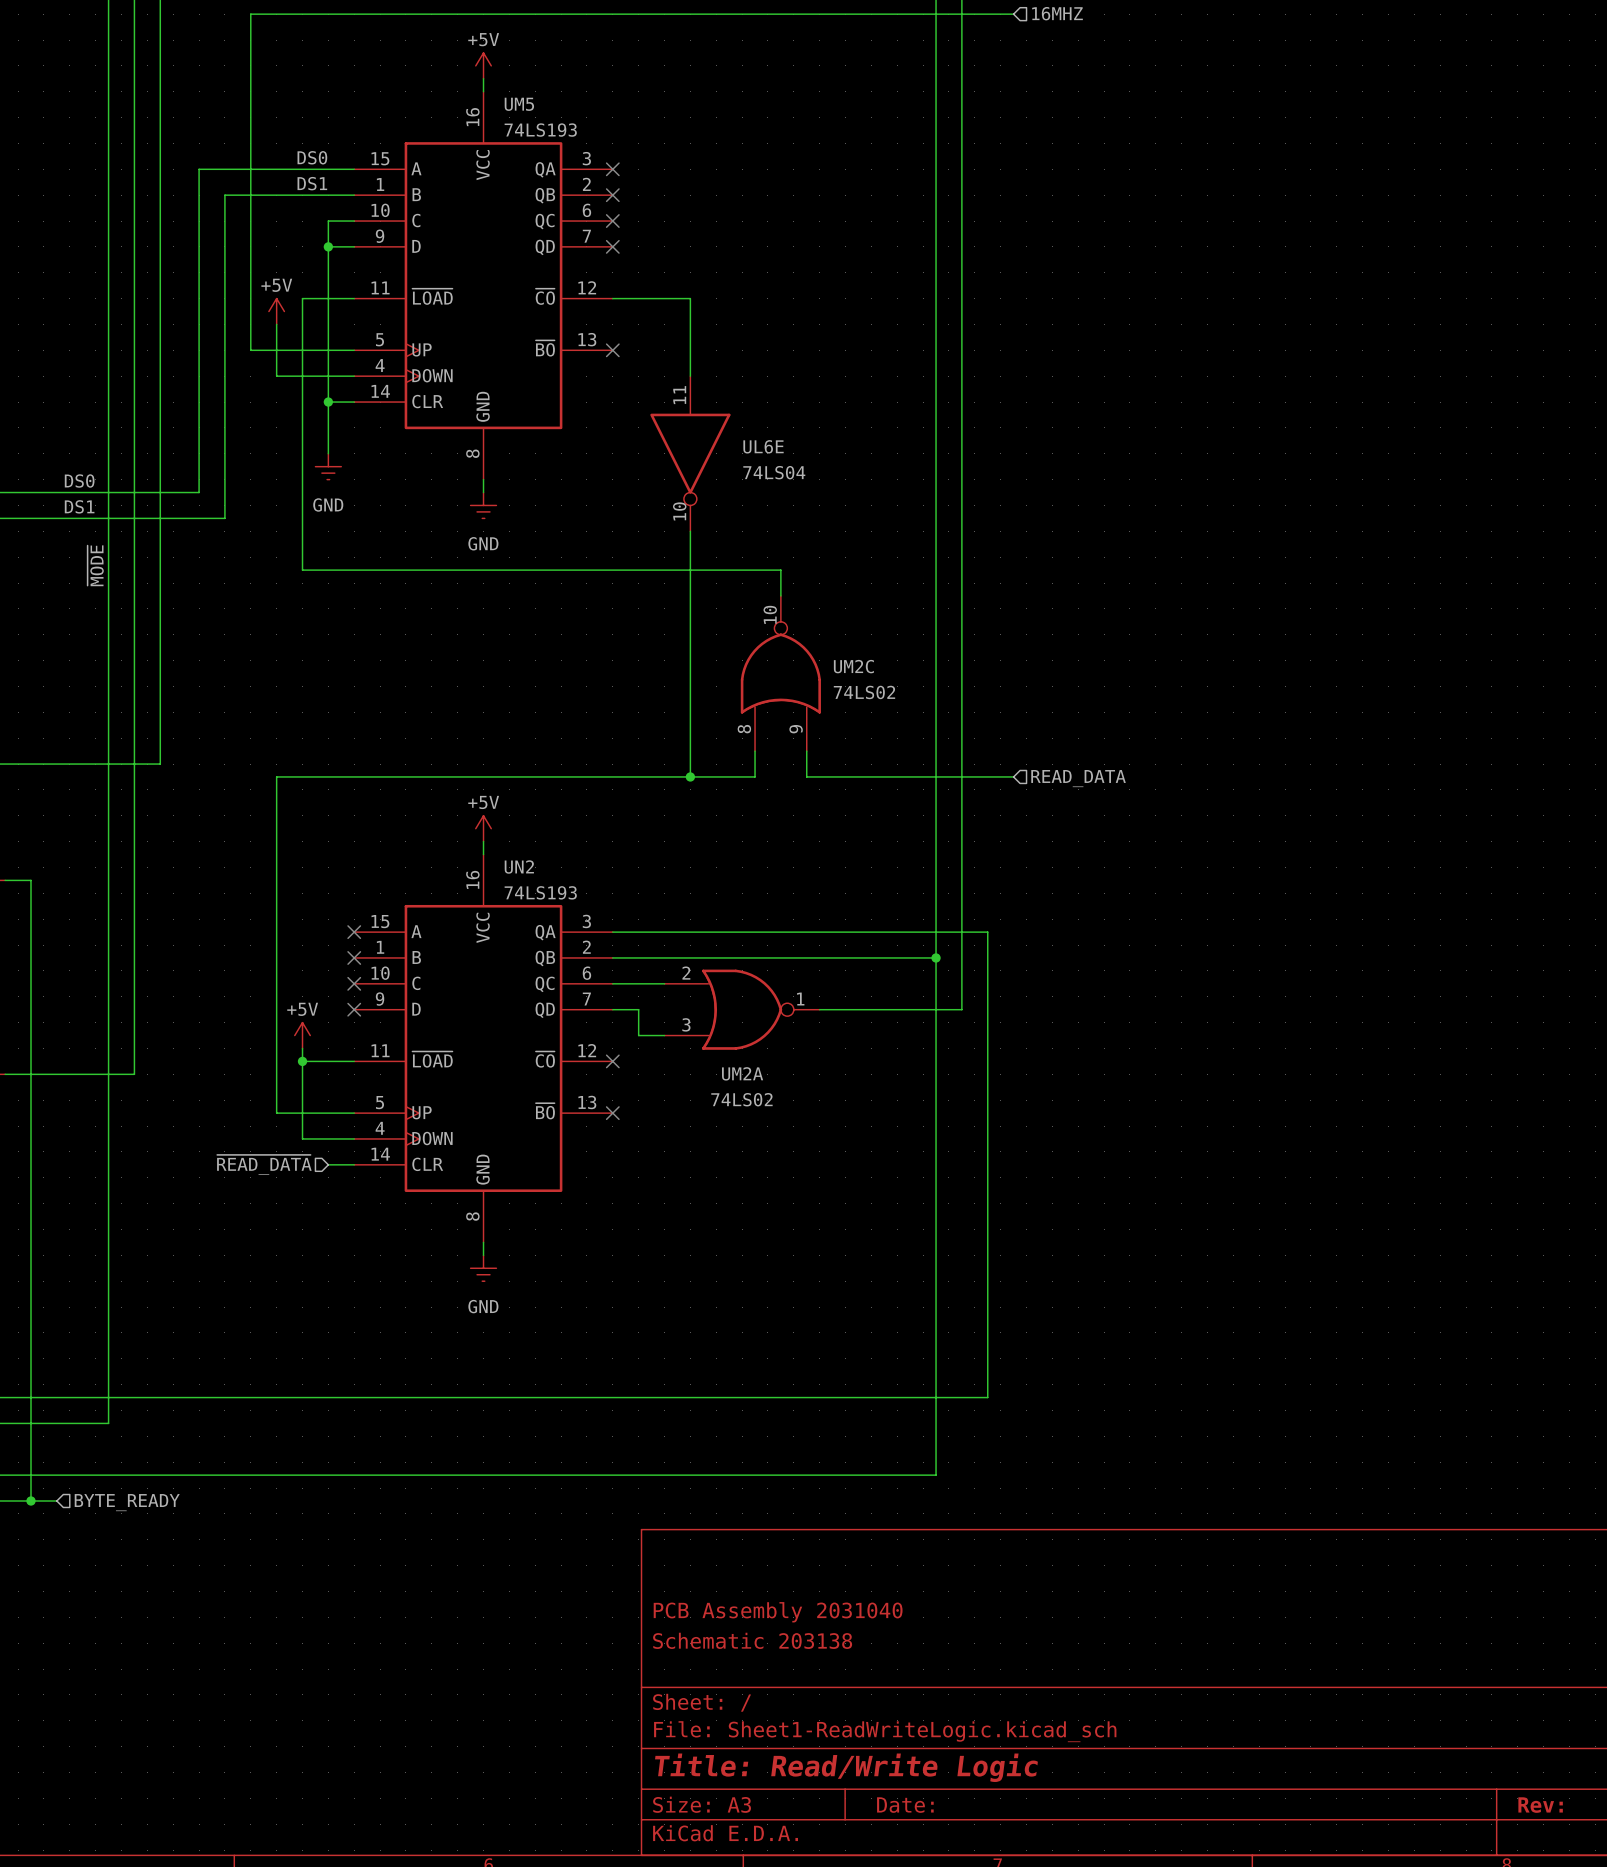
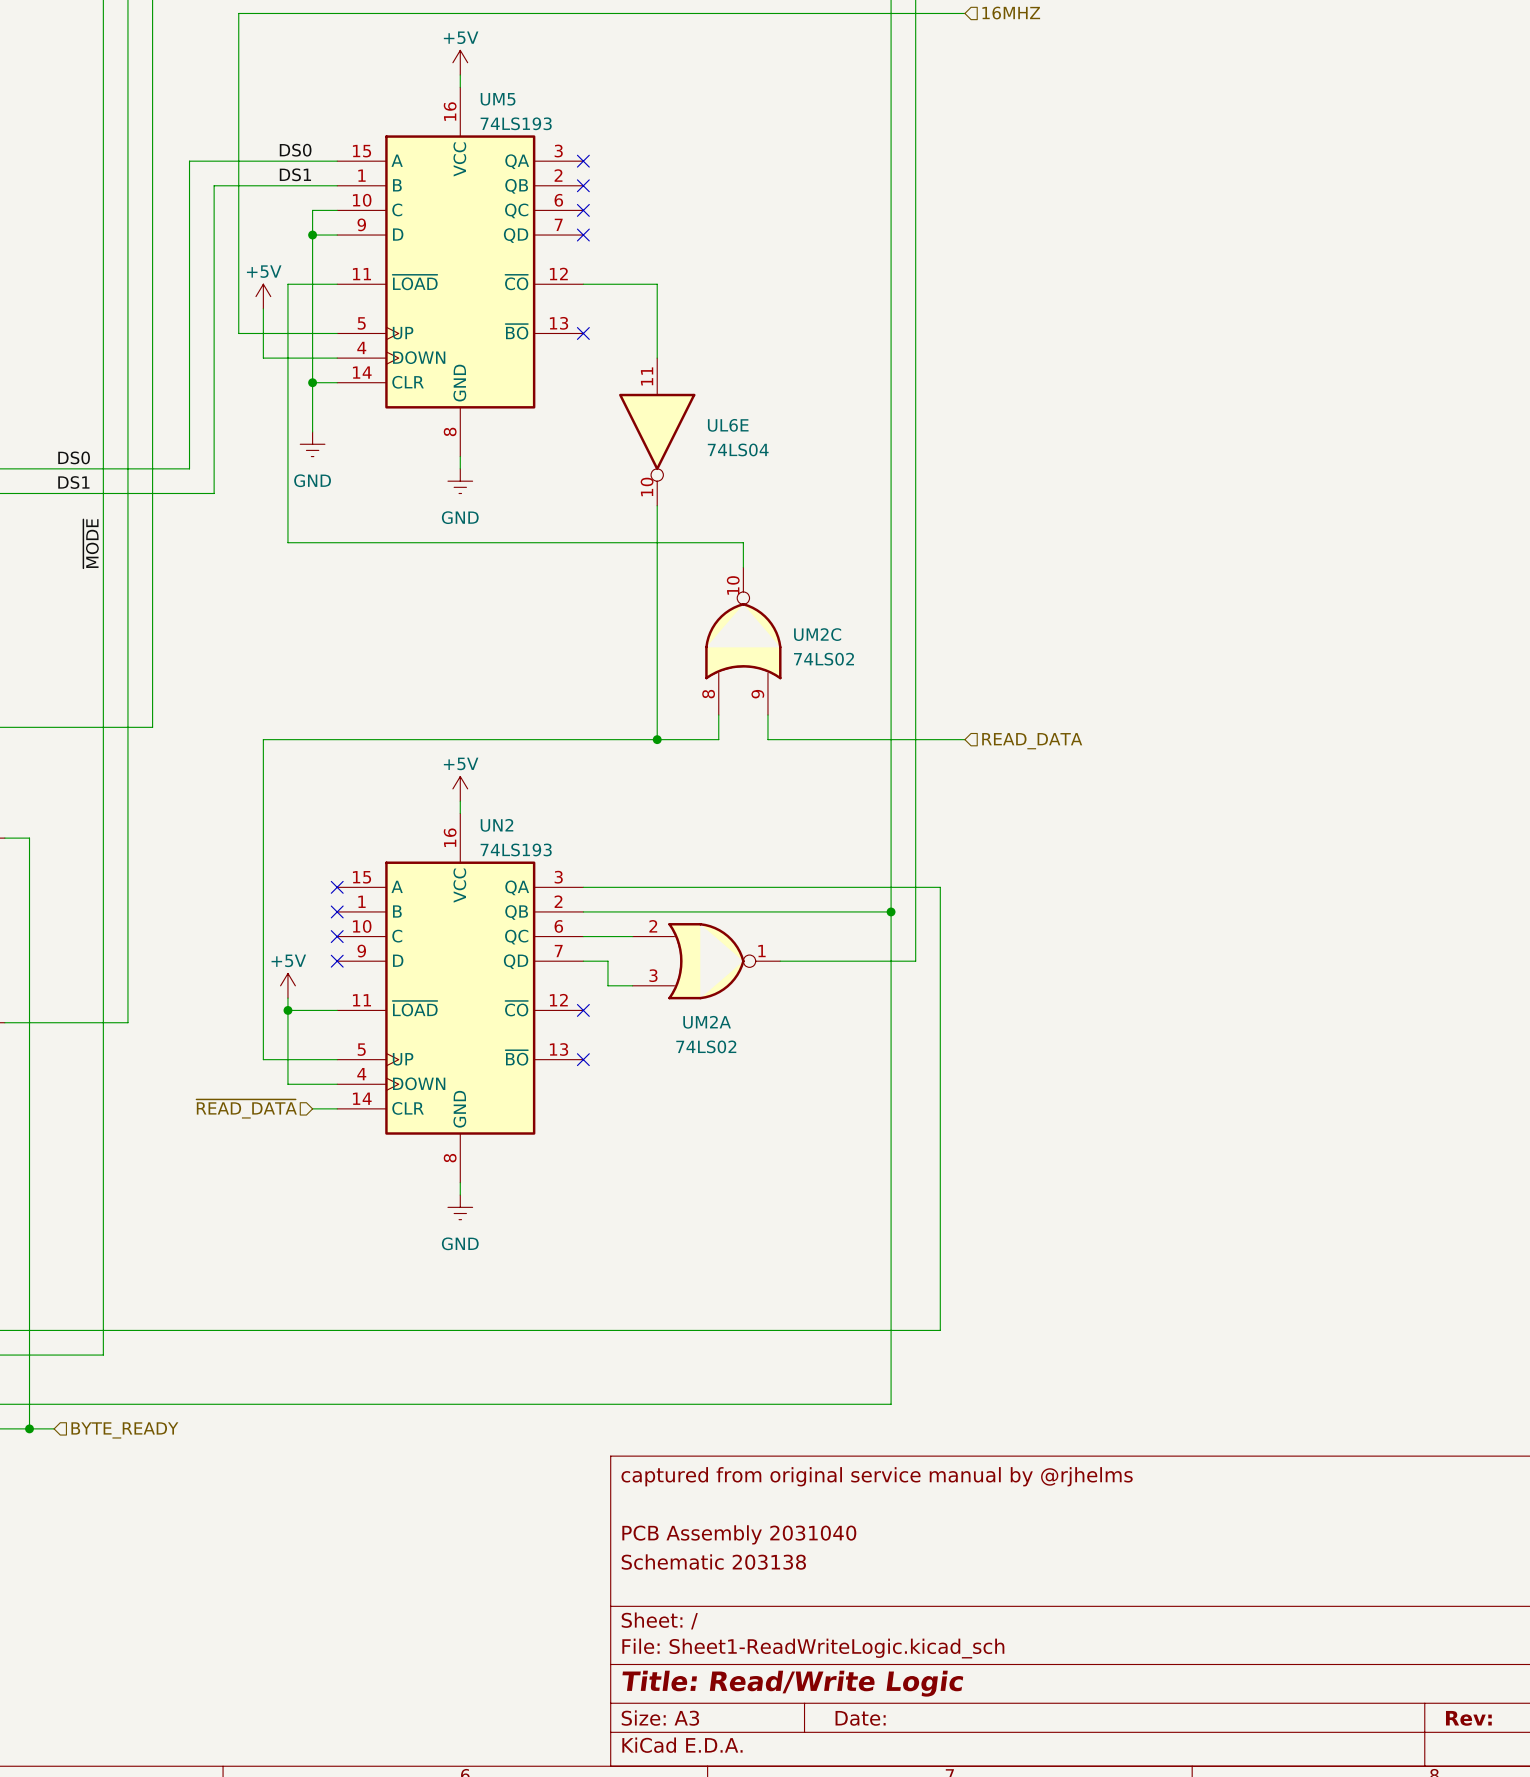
title block: none -> captured from original service manual by @rjhelms (877, 1476)

